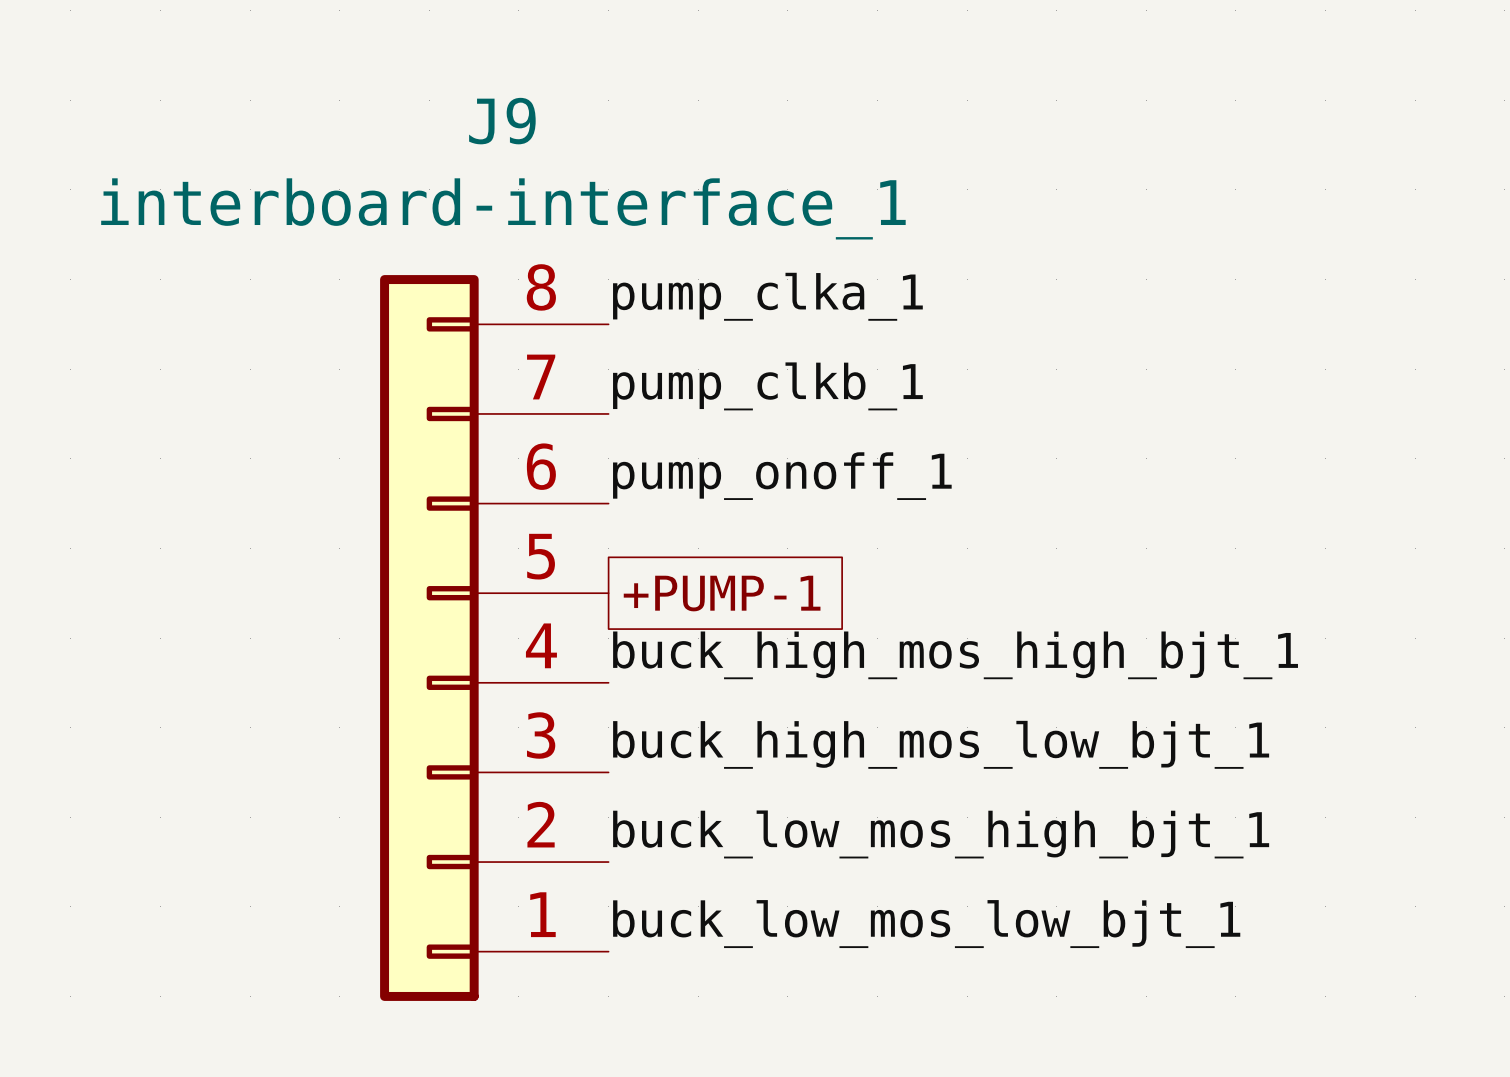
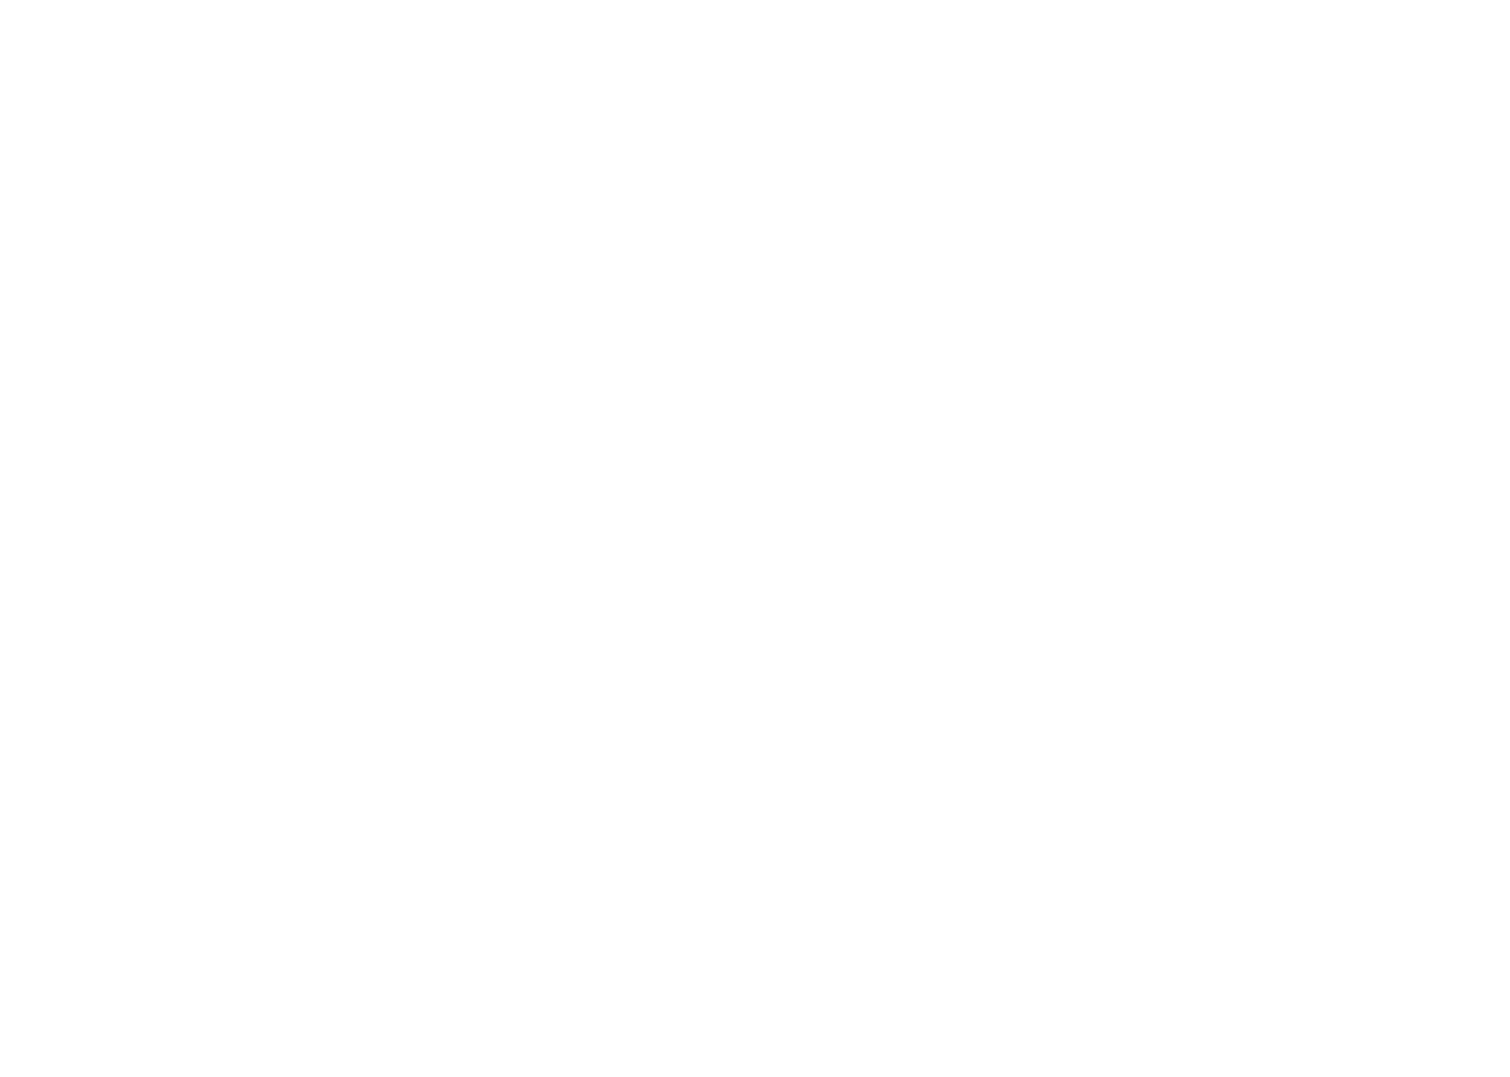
label: pump_clka_1 (767, 296) -> none
label: pump_clkb_1 (767, 386) -> none
label: pump_onoff_1 (782, 476) -> none
global label: +PUMP-1 (722, 593) -> none
J9: interboard-interface_1 (494, 638) -> none
label: buck_high_mos_high_bjt_1 (955, 655) -> none
label: buck_high_mos_low_bjt_1 (941, 744) -> none
label: buck_low_mos_high_bjt_1 (941, 834) -> none
label: buck_low_mos_low_bjt_1 (926, 924) -> none

